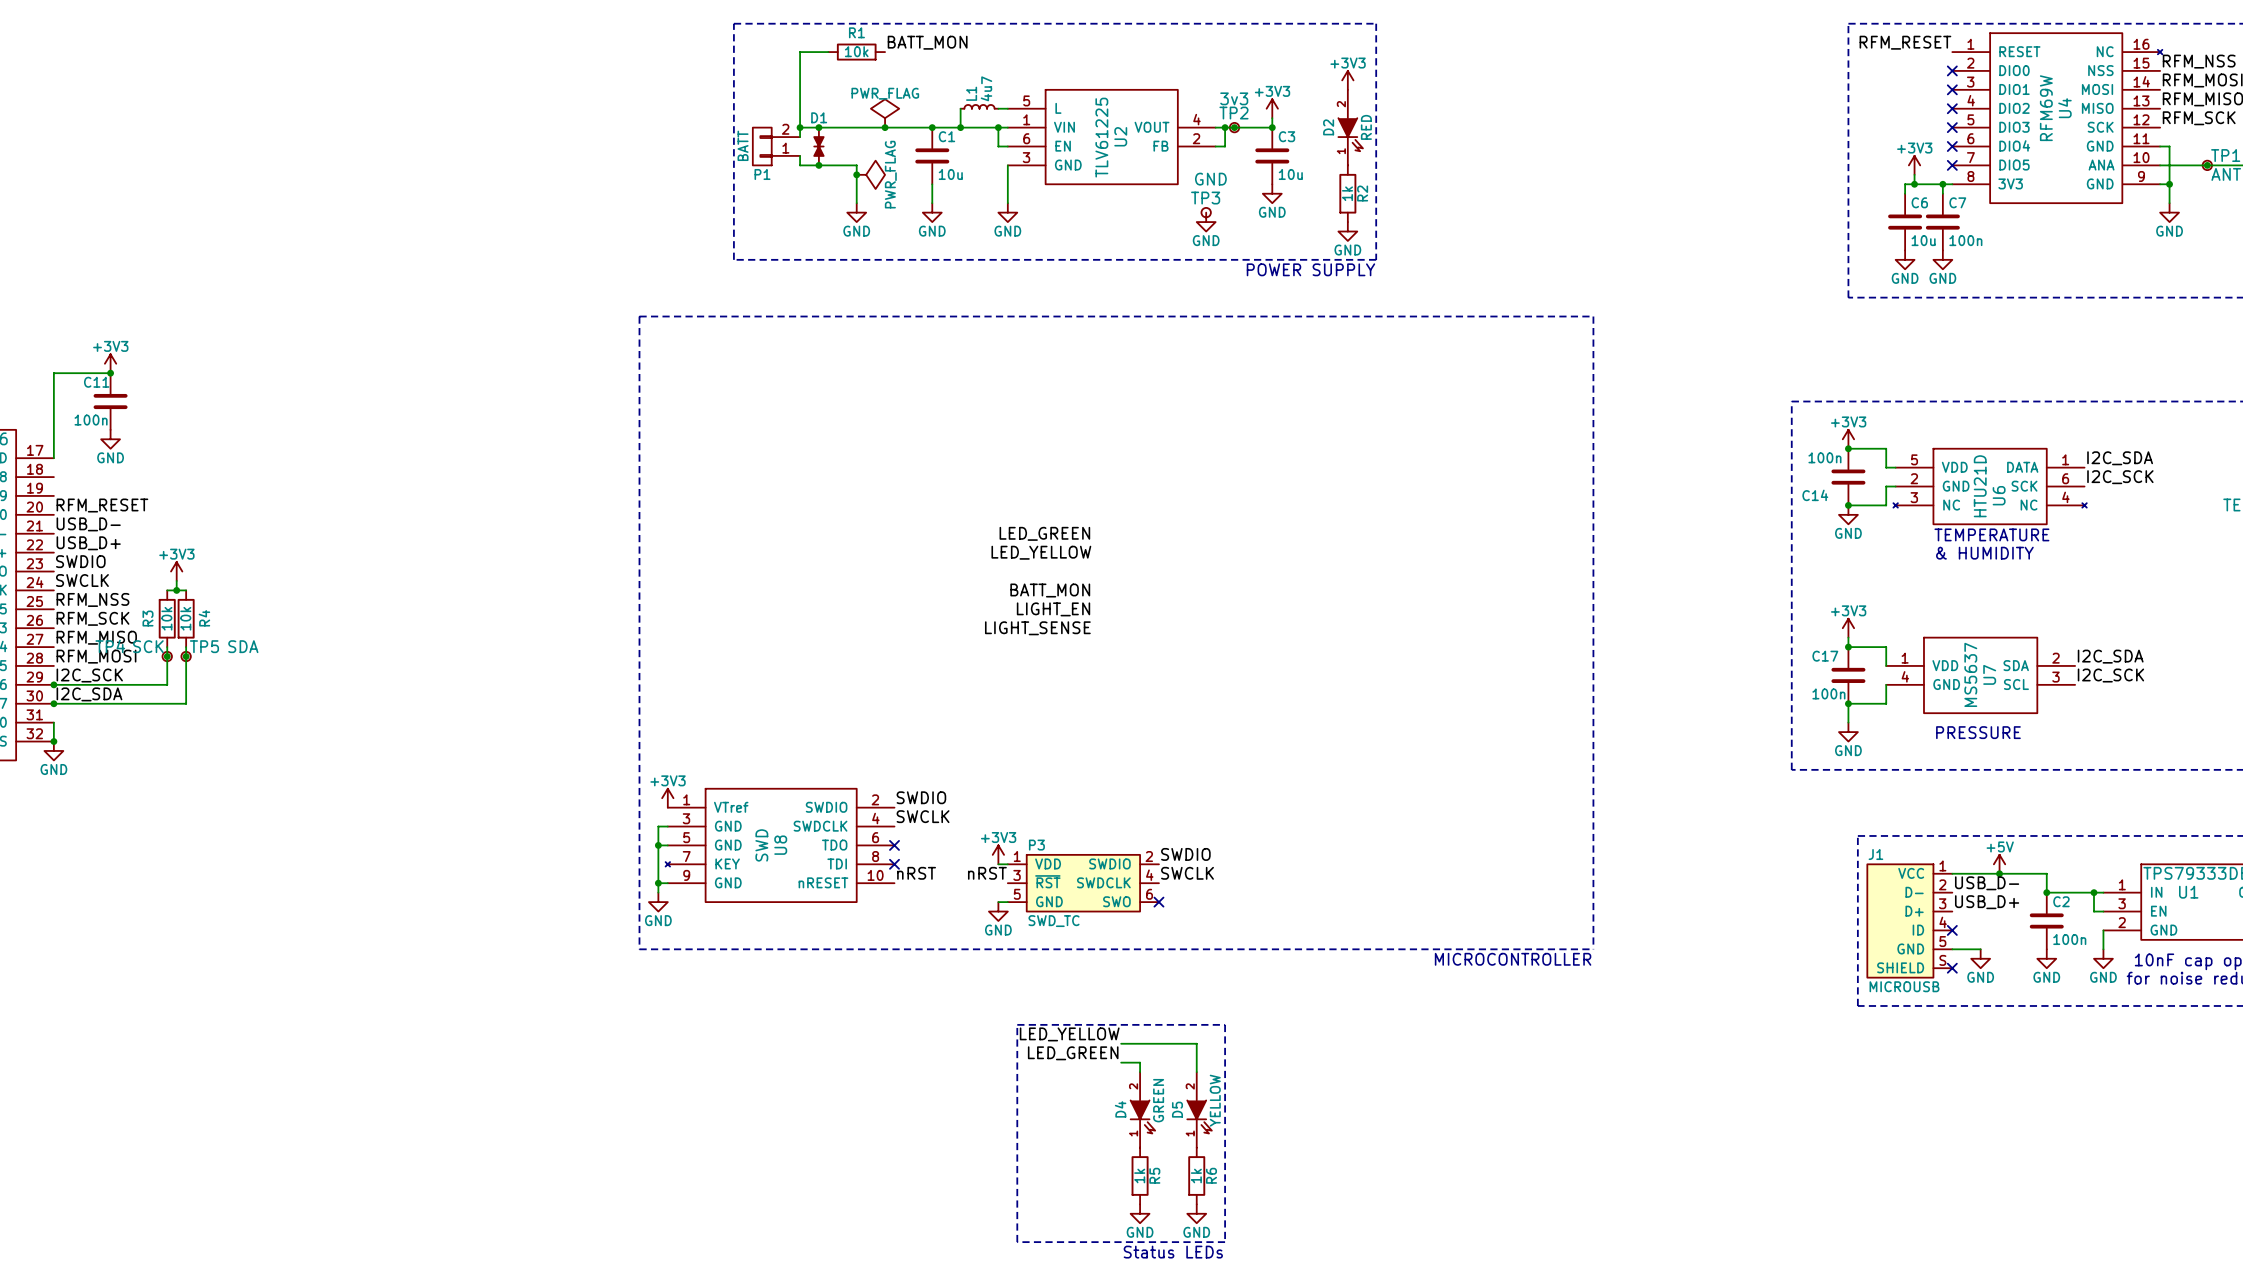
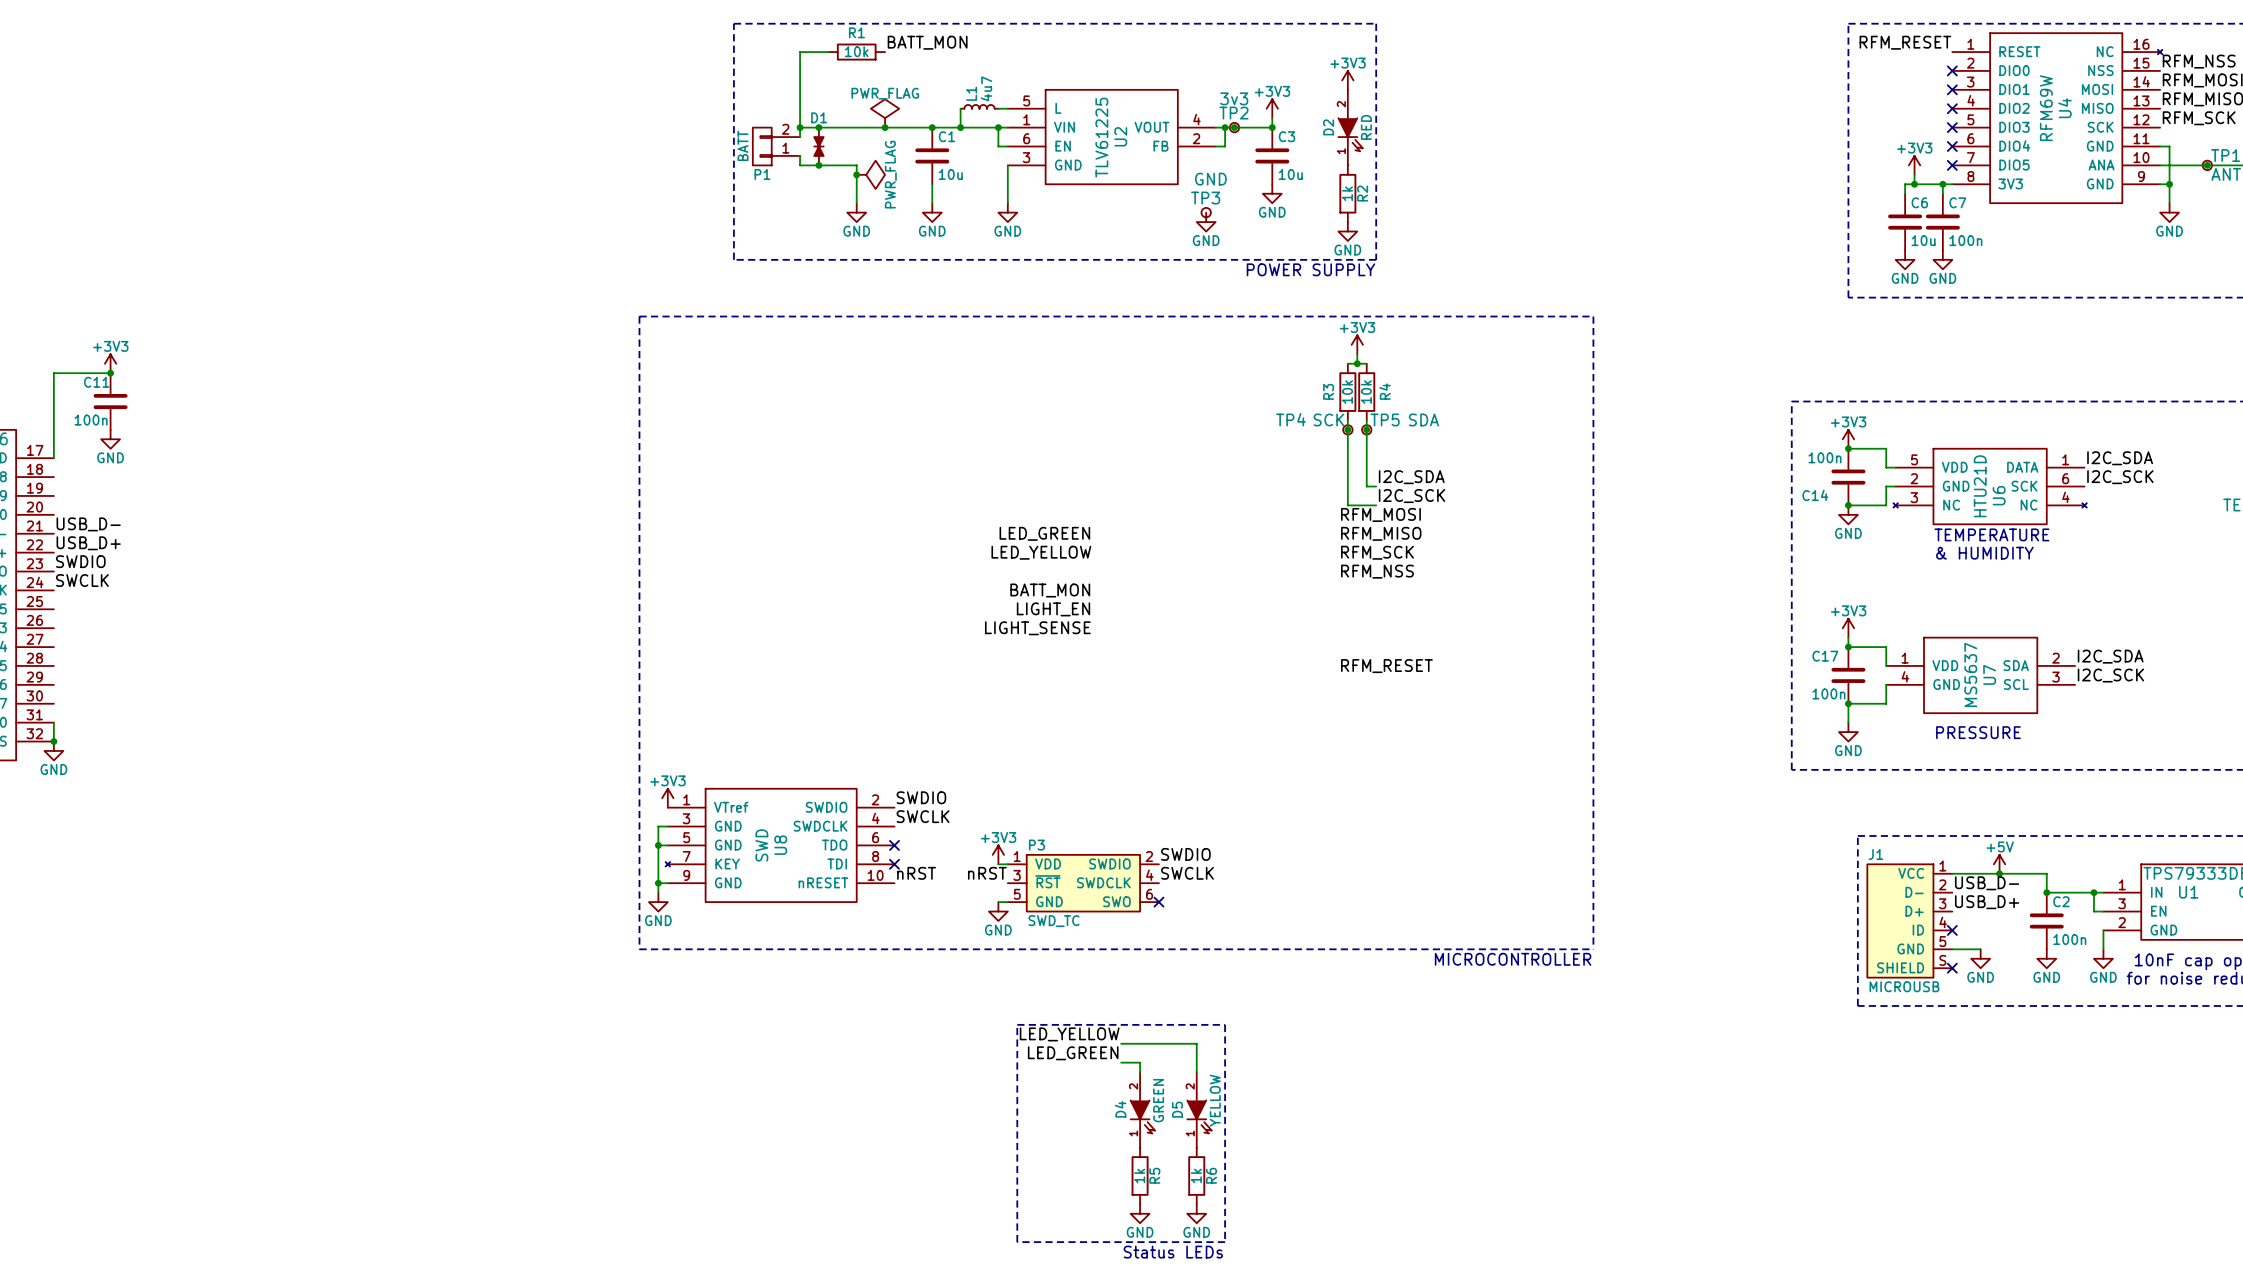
power symbol: none -> +3V3 (1357, 344)
wire: none -> (1357, 354) (1357, 363)
wire: none -> (1347, 363) (1366, 363)
junction: none -> (1357, 363)
wire: none -> (1347, 420) (1347, 505) (1376, 505)
wire: none -> (1366, 420) (1366, 486) (1376, 486)
junction: none -> (1347, 429)
junction: none -> (1366, 429)
label: none -> I2C_SDA (1411, 477)
label: none -> I2C_SCK (1412, 496)
label: RFM_RESET (102, 505) -> none
label: none -> RFM_MOSI (1380, 514)
label: none -> RFM_MISO (1381, 533)
label: none -> RFM_SCK (1377, 552)
power symbol: +3V3 (176, 571) -> none
label: none -> RFM_NSS (1377, 571)
wire: (176, 580) (176, 590) -> none
wire: (167, 590) (186, 590) -> none
junction: (176, 590) -> none
label: RFM_NSS (92, 599) -> none
label: RFM_SCK (92, 618) -> none
R3 position: (167, 618) -> (1347, 392)
R4 position: (186, 618) -> (1366, 392)
label: RFM_MISO (96, 637) -> none
wire: (167, 647) (167, 684) (53, 684) -> none
wire: (186, 647) (186, 703) (53, 703) -> none
label: RFM_MOSI (96, 656) -> none
TP4 position: (167, 656) -> (1347, 429)
junction: (167, 656) -> none
TP5 position: (186, 656) -> (1366, 429)
junction: (186, 656) -> none
label: none -> RFM_RESET (1386, 666)
label: I2C_SCK (89, 675) -> none
junction: (53, 684) -> none
label: I2C_SDA (89, 694) -> none
junction: (53, 703) -> none

